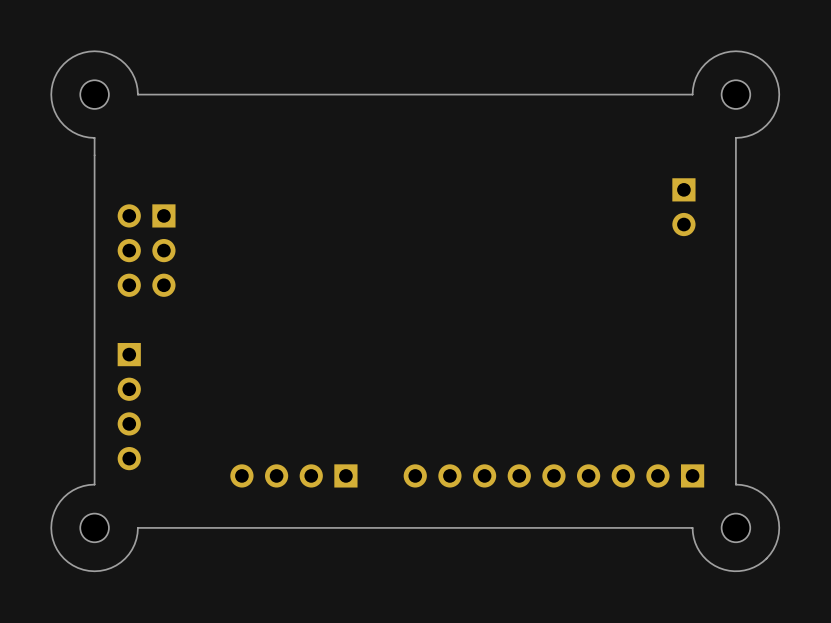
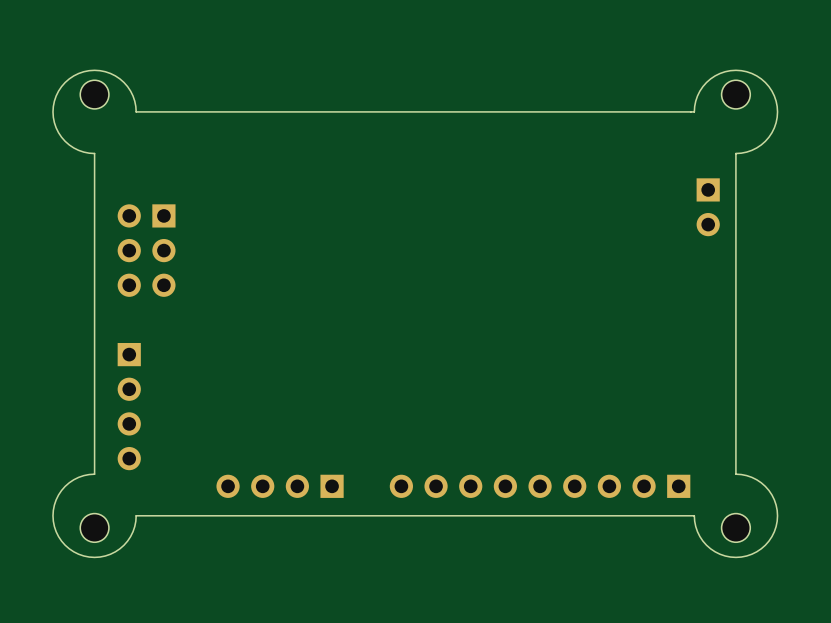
board edge: (735, 153) (735, 137) (752, 134) (766, 125) (775, 111) (779, 94) (775, 78) (770, 68) (757, 57) (741, 51) (724, 52) (705, 63) (695, 78) (692, 94) (137, 94) (134, 78) (125, 63) (111, 54) (94, 51) (78, 54) (63, 63) (54, 78) (51, 94) (54, 111) (63, 125) (78, 134) (94, 137) (94, 153) -> (735, 153) (751, 150) (765, 141) (774, 127) (777, 111) (774, 96) (765, 82) (756, 75) (741, 70) (725, 71) (710, 78) (699, 91) (694, 111) (136, 111) (133, 96) (124, 82) (110, 73) (94, 70) (78, 73) (65, 82) (56, 96) (52, 111) (56, 127) (65, 141) (78, 150) (94, 153)
part position: (683, 207) -> (708, 207)
board edge: (735, 474) (735, 484) (752, 487) (766, 497) (775, 511) (778, 522) (777, 539) (770, 554) (758, 564) (744, 570) (724, 569) (710, 562) (697, 547) (692, 527) (137, 527) (134, 544) (125, 558) (111, 567) (94, 571) (78, 567) (63, 558) (54, 544) (51, 527) (52, 516) (60, 501) (72, 490) (94, 484) (94, 474) -> (735, 474) (746, 475) (761, 482) (771, 494) (777, 510) (776, 526) (768, 541) (756, 551) (741, 557) (720, 554) (706, 545) (697, 531) (694, 515) (136, 515) (133, 531) (124, 545) (110, 554) (94, 557) (78, 554) (65, 545) (56, 531) (52, 515) (56, 499) (65, 486) (78, 477) (94, 474)
part position: (293, 475) -> (280, 486)
part position: (553, 475) -> (540, 486)

